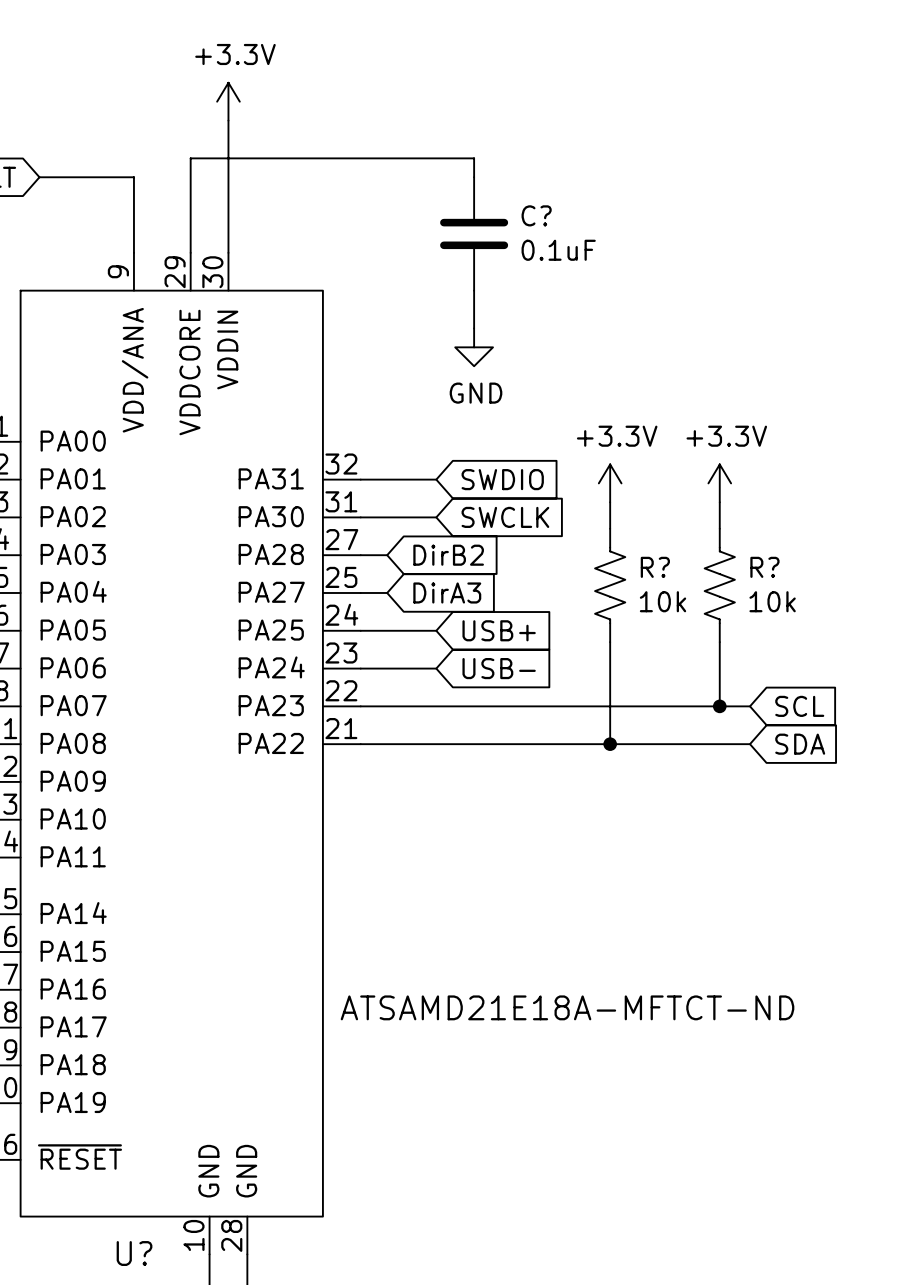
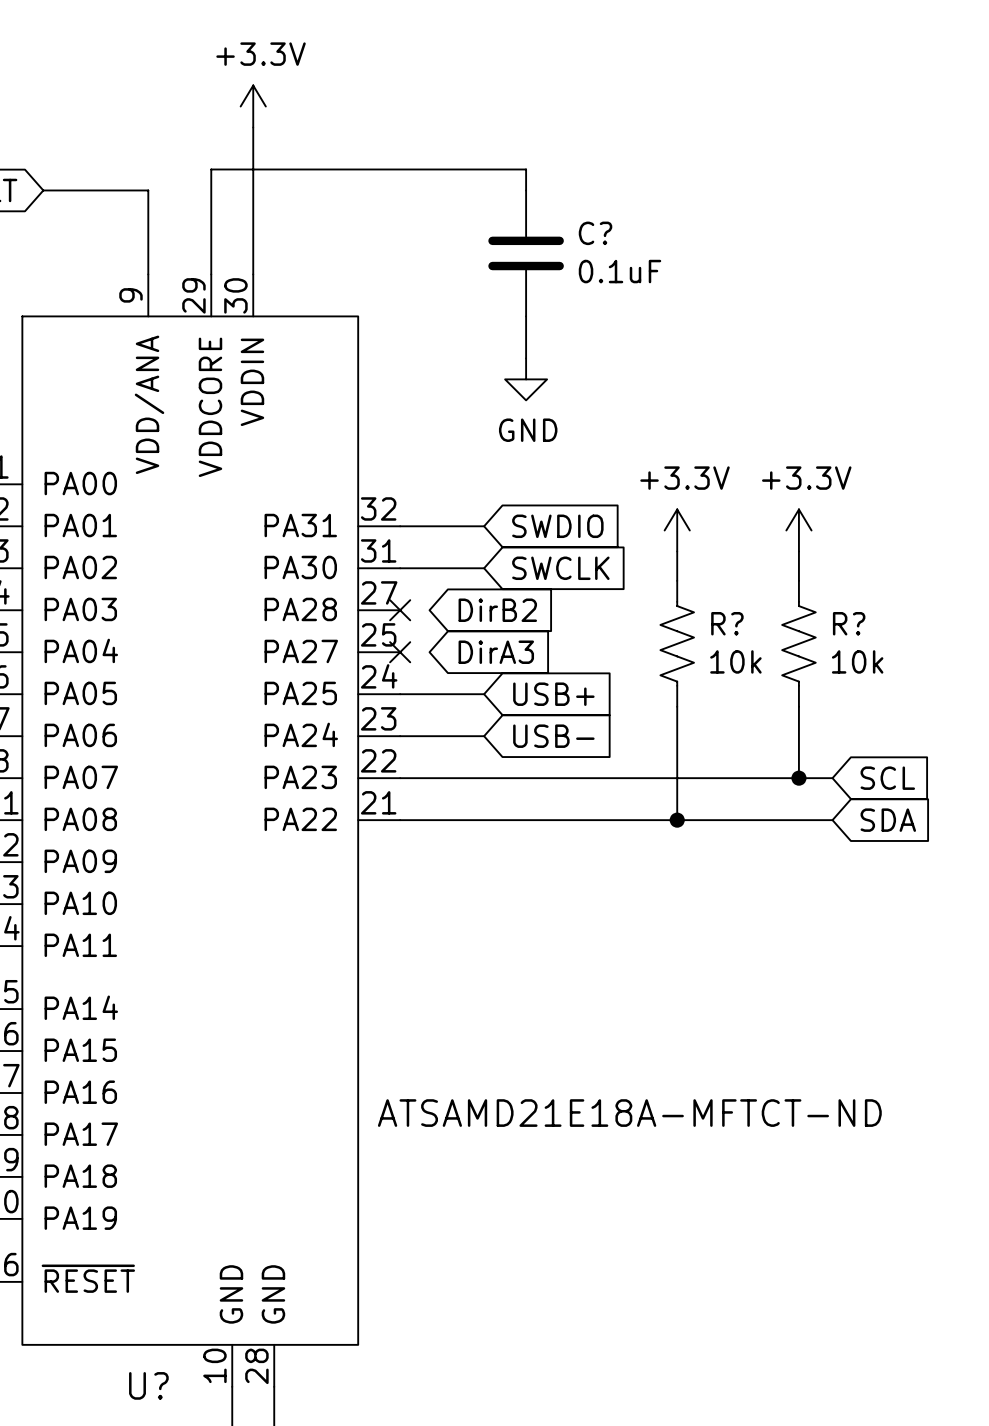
wire: (360, 555) (387, 555) -> none
no-connect mark: none -> (400, 610)
wire: (360, 592) (387, 592) -> none
no-connect mark: none -> (400, 652)

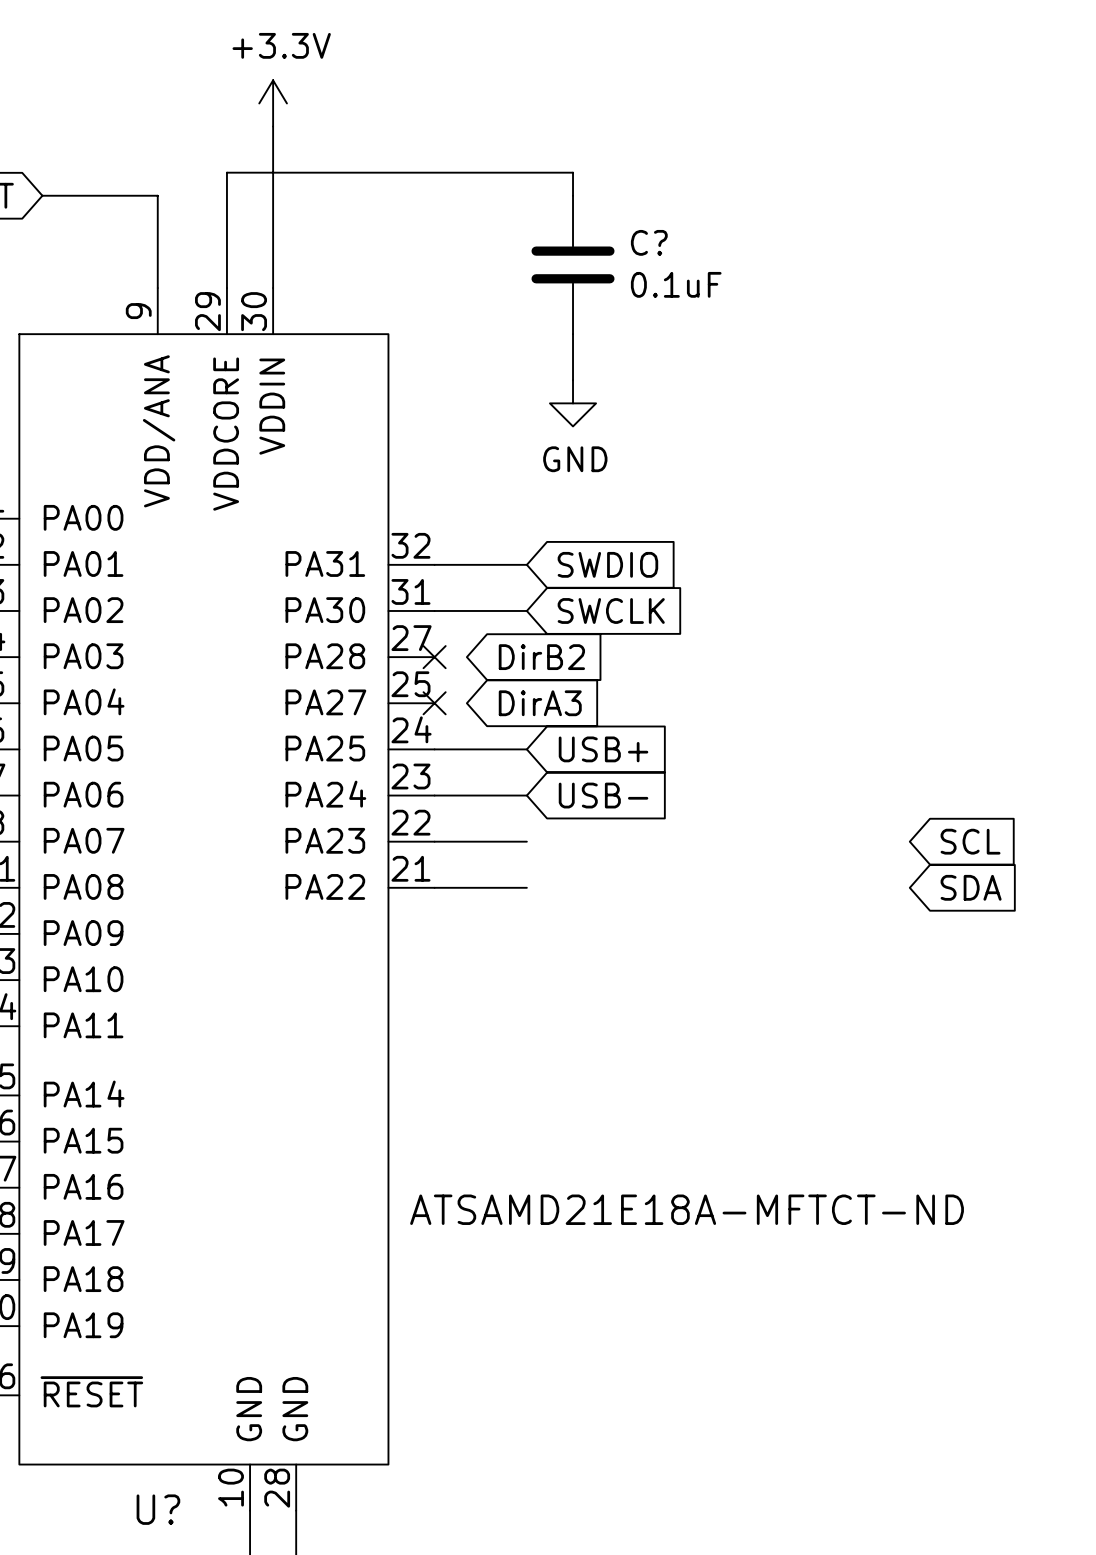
power symbol: +3.3V (677, 530) -> none
power symbol: +3.3V (798, 530) -> none
wire: (677, 551) (677, 580) -> none
wire: (798, 551) (798, 580) -> none
R?: 10k (677, 643) -> none
R?: 10k (798, 643) -> none
wire: (677, 706) (677, 820) -> none
wire: (798, 706) (798, 778) -> none
wire: (484, 778) (832, 778) -> none
junction: (798, 778) -> none
wire: (484, 820) (832, 820) -> none
junction: (677, 820) -> none

